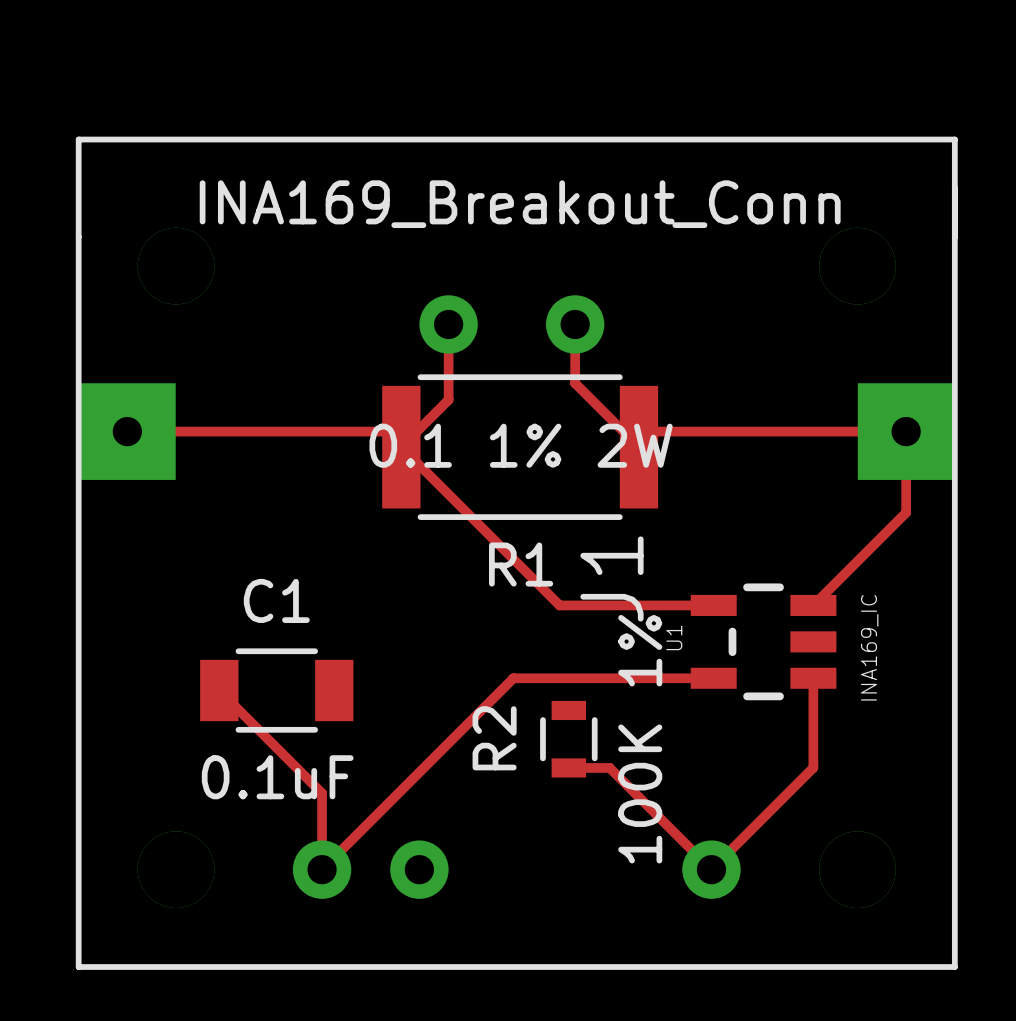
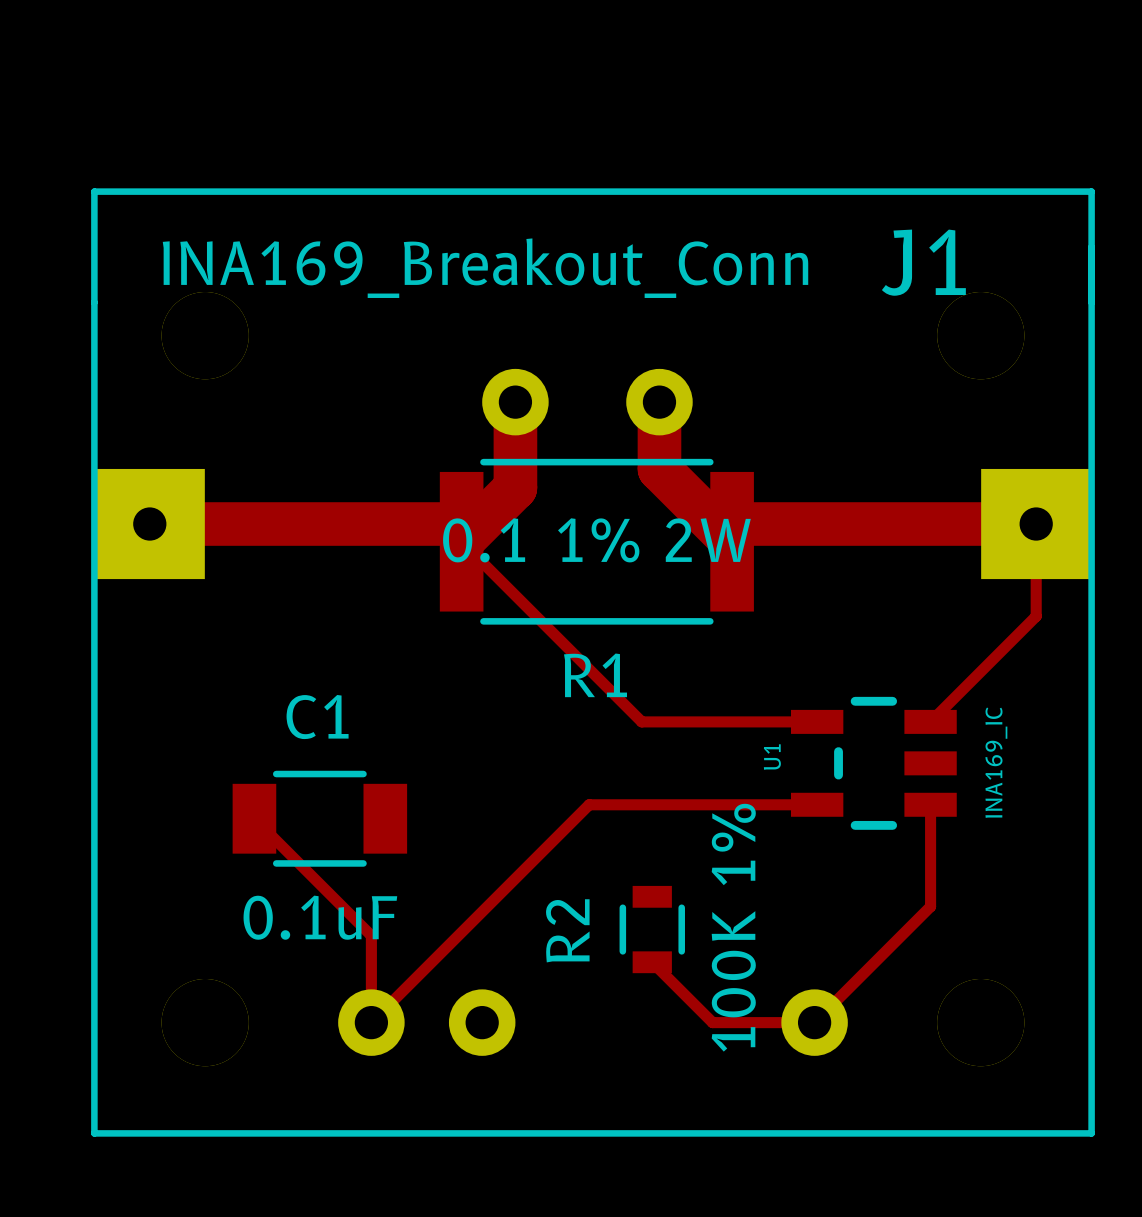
J1 value position: INA169_Breakout_Conn (520, 204) -> INA169_Breakout_Conn (485, 268)
top track width: thin (448, 324) (448, 399) (401, 447) -> thick (515, 402) (515, 487) (461, 541)
top track width: thin (575, 324) (575, 383) (638, 447) -> thick (659, 402) (659, 469) (732, 541)
top track width: thin (127, 431) (385, 431) -> thick (149, 524) (443, 524)
top track width: thin (654, 431) (906, 431) -> thick (749, 524) (1036, 524)
J1 name rotation: 0° (611, 578) -> 90° clockwise (923, 262)
J1 name position: J1 (611, 578) -> J1 (923, 262)
R2 position: (568, 739) -> (652, 929)
top track: (568, 767) (609, 767) (711, 869) -> (652, 962) (712, 1022) (814, 1022)

